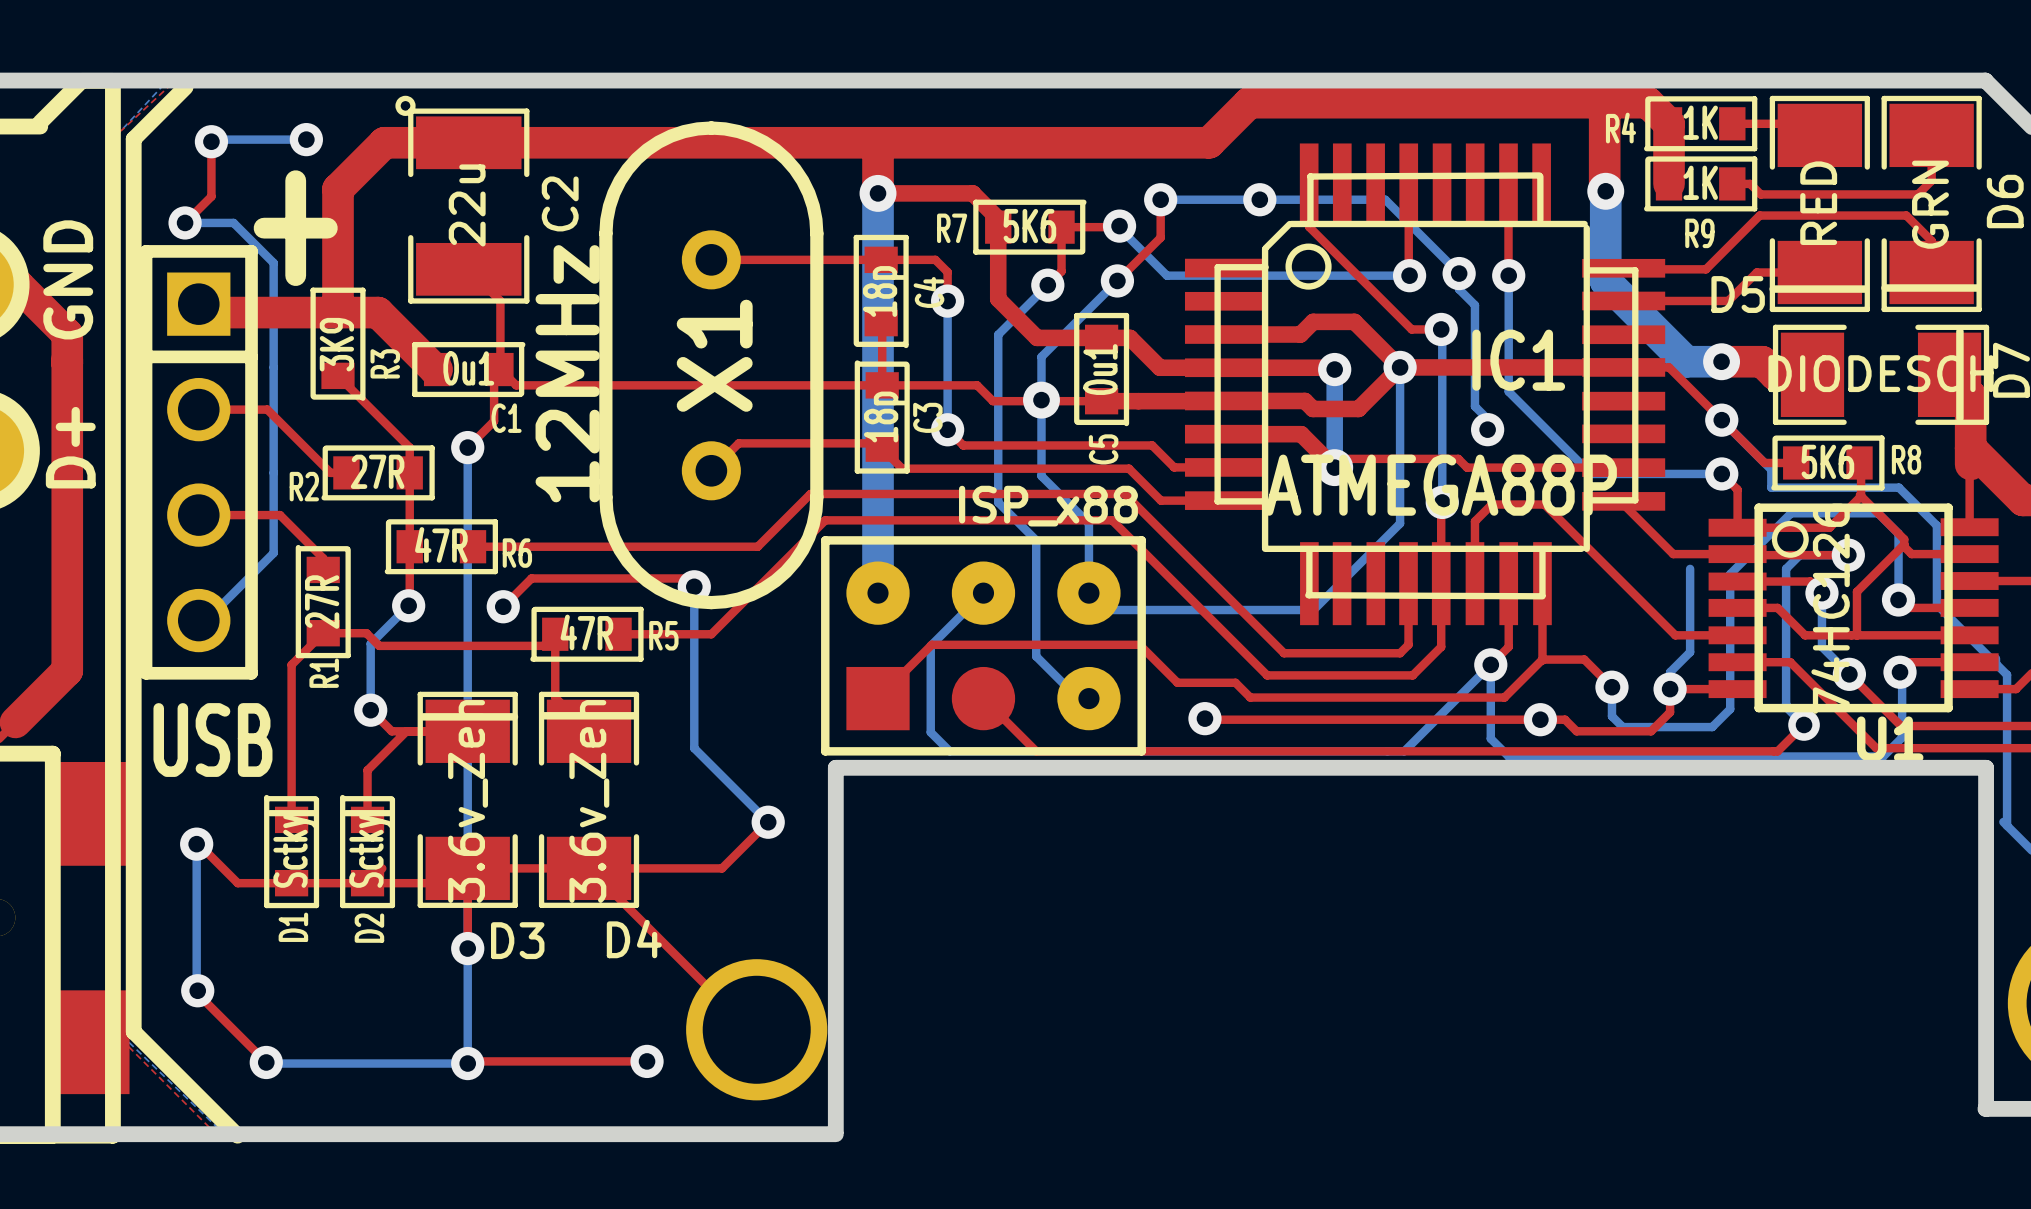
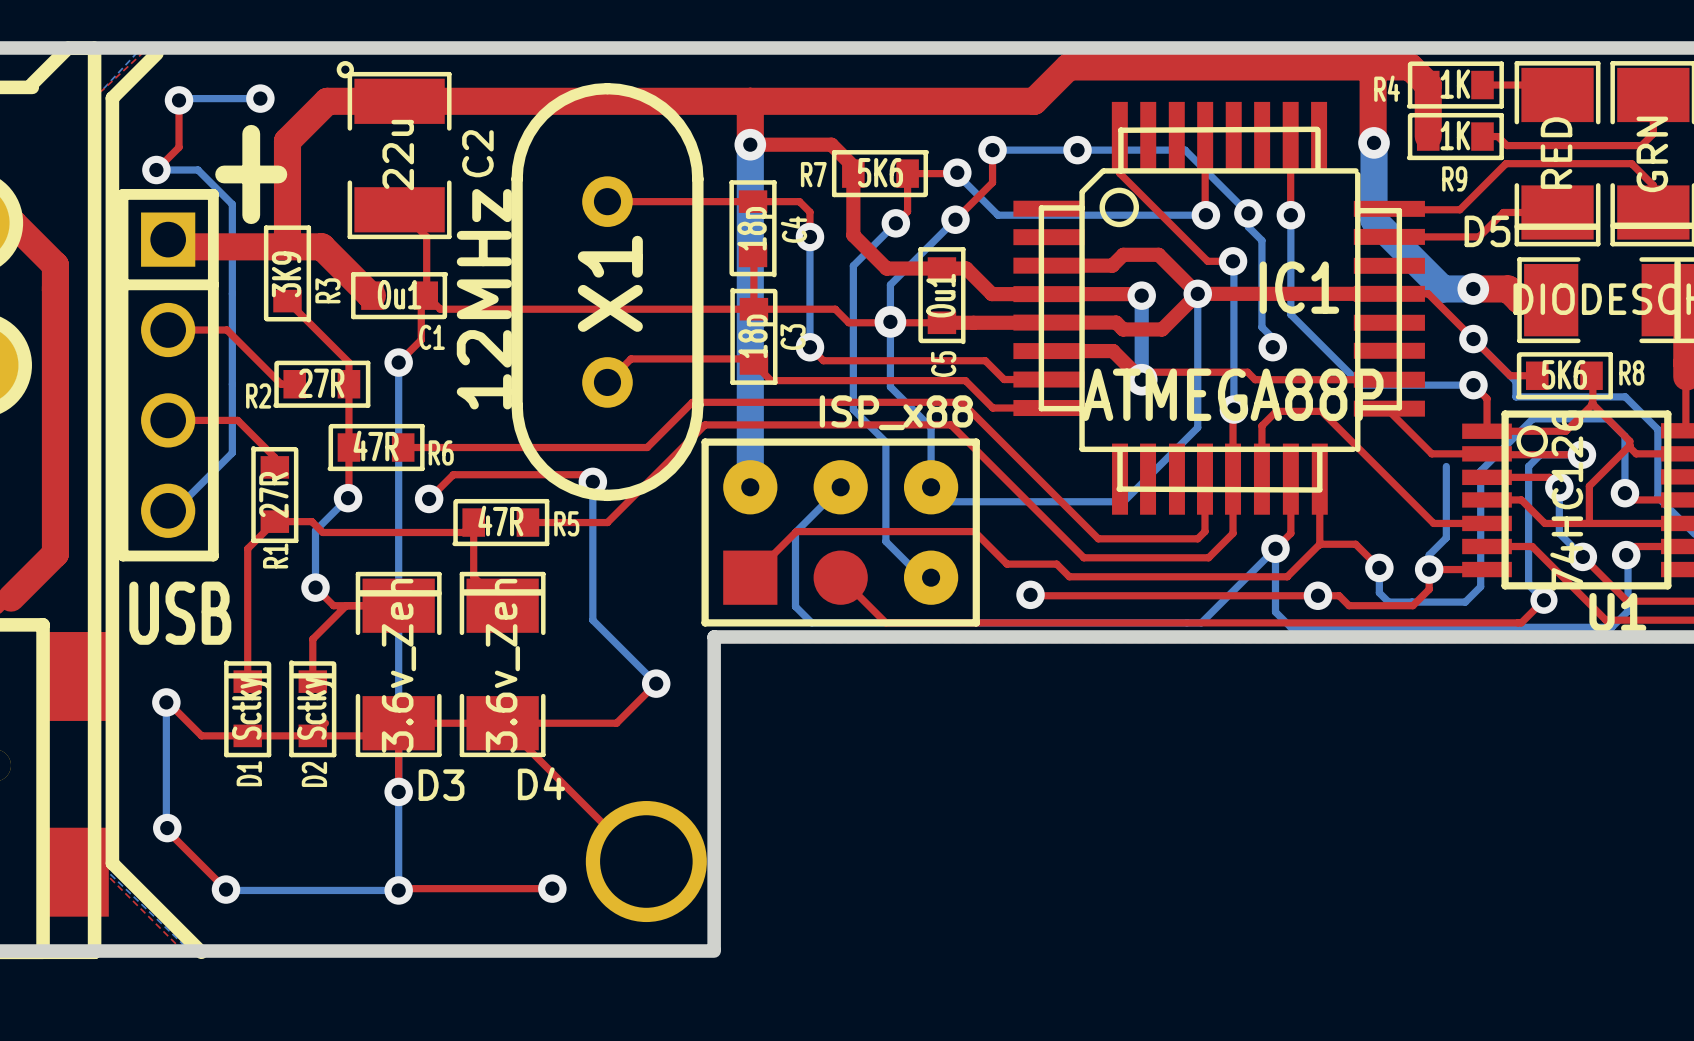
text: GND (68, 279) -> none
text: D+ (70, 447) -> none

